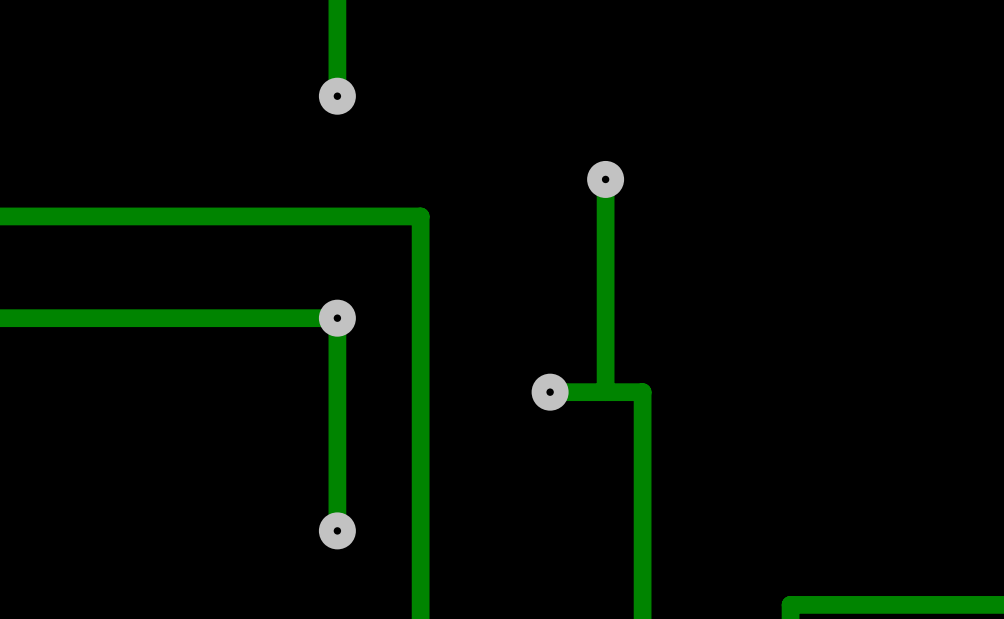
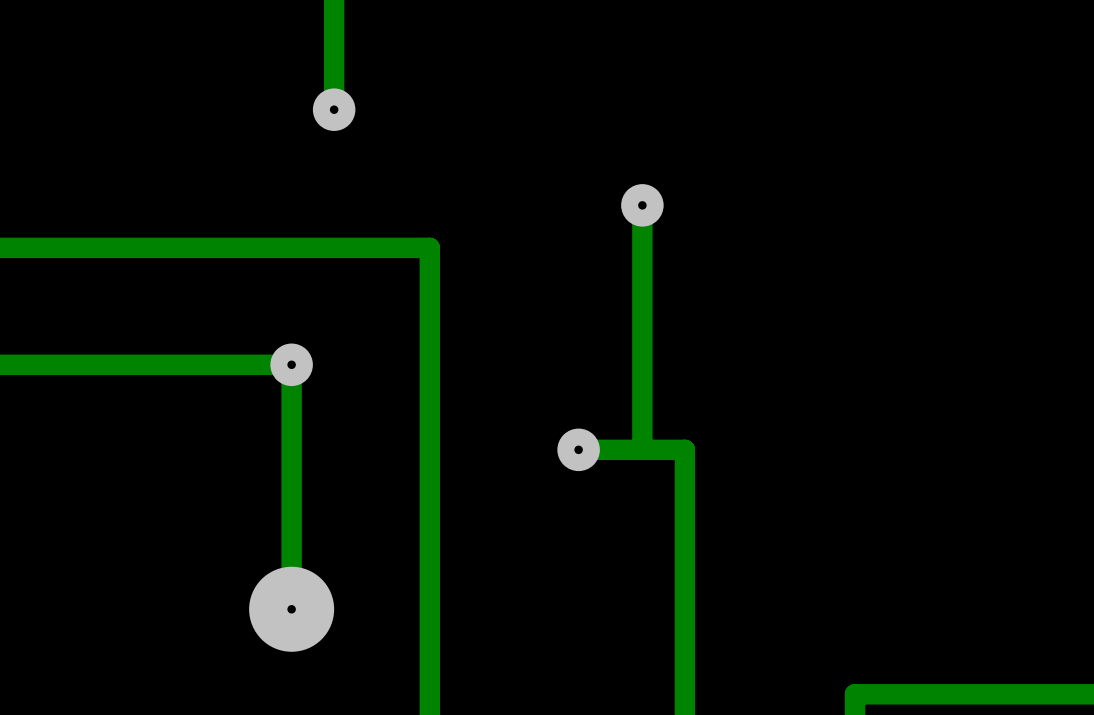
track: (300, 318) (337, 318) (337, 530) -> (291, 364) (291, 609)
via position: (337, 318) -> (291, 364)
via: none -> (291, 609)
via: (337, 530) -> none

